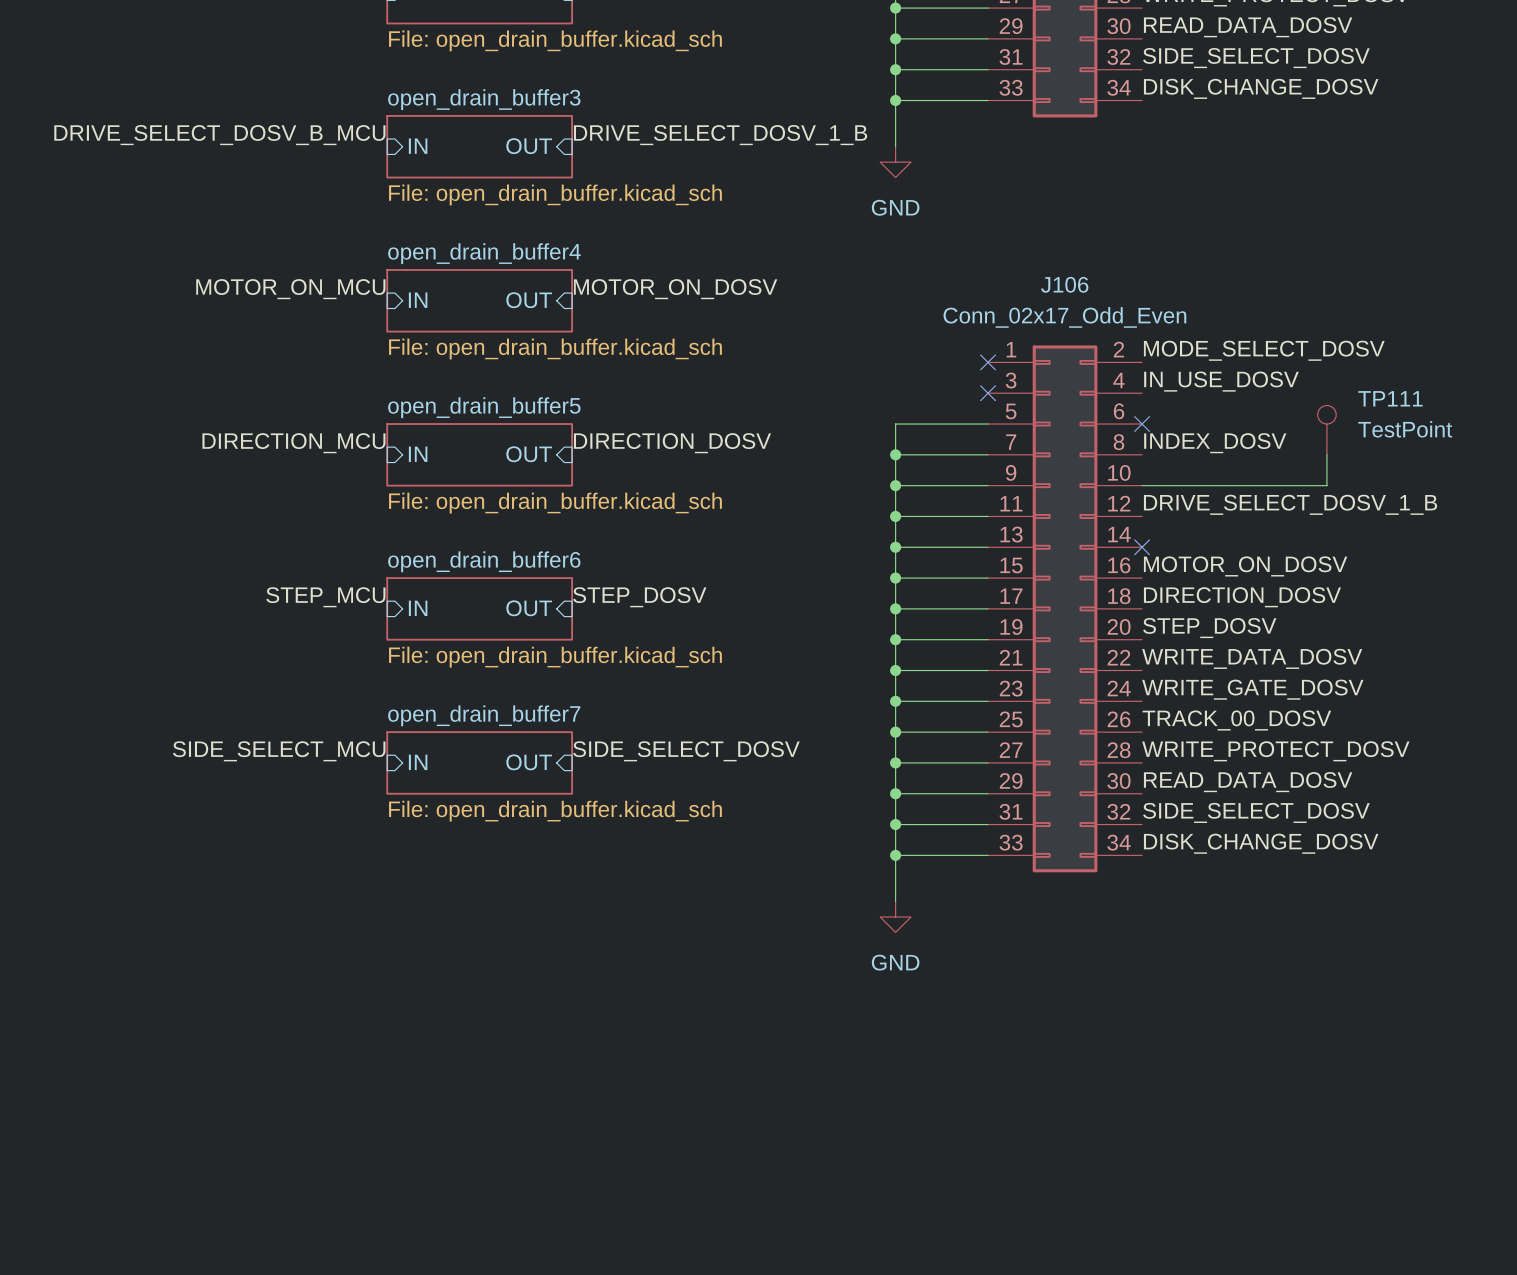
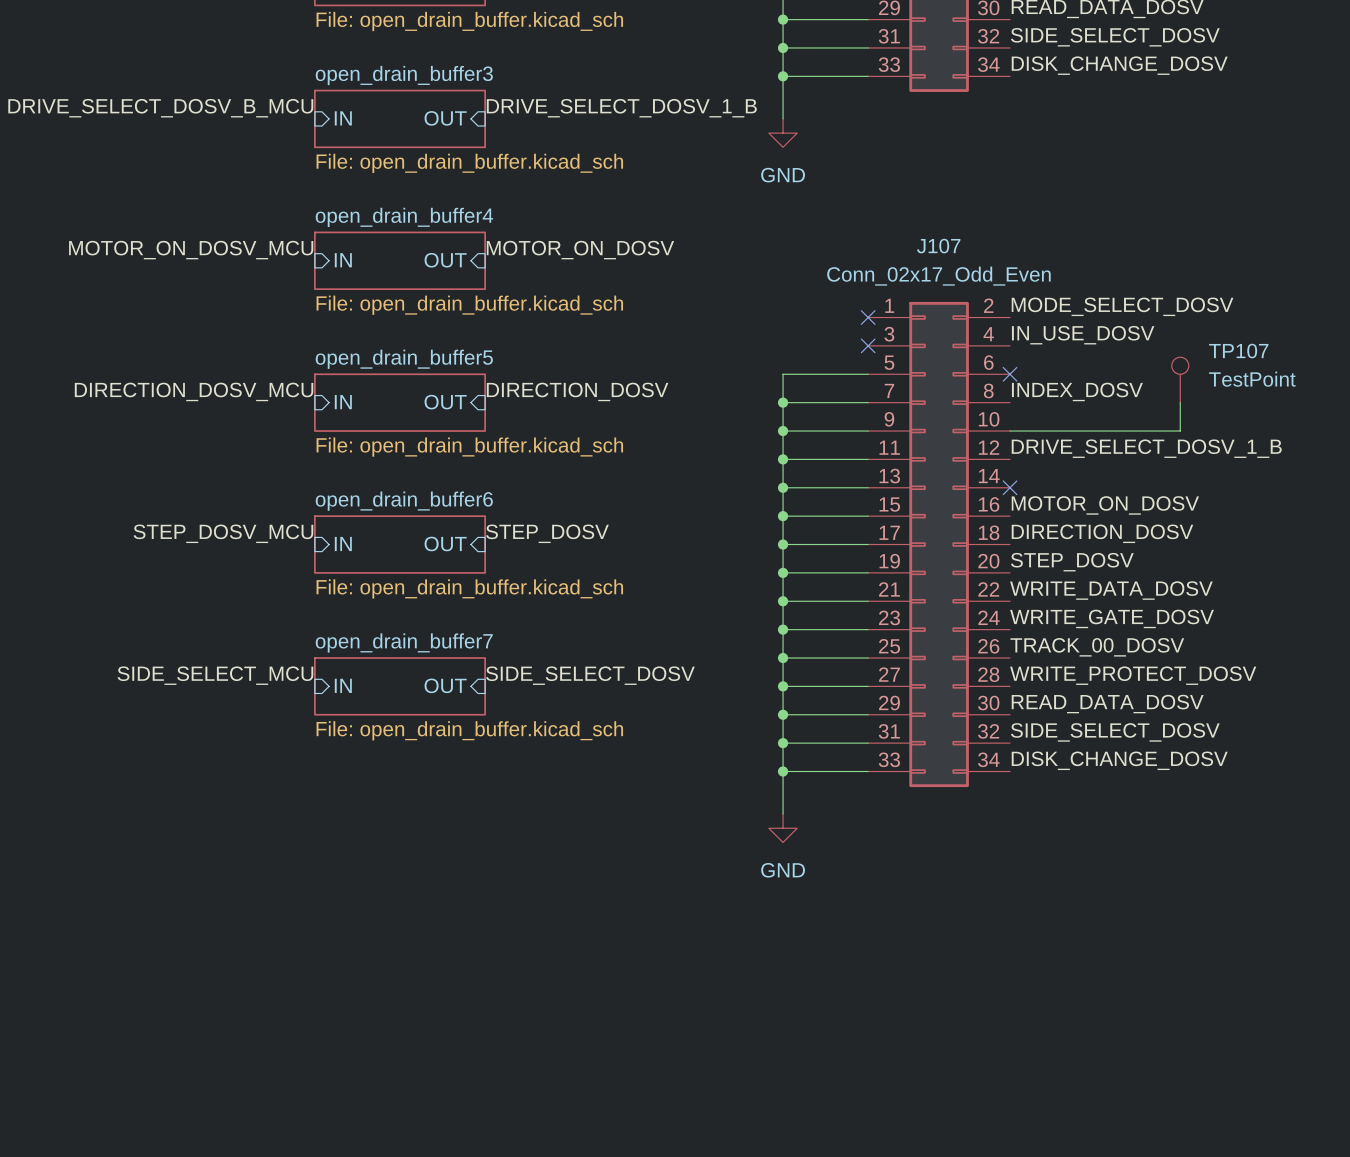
J106 name: J106 (1064, 284) -> J107 (938, 246)
label: MOTOR_ON_MCU (290, 289) -> MOTOR_ON_DOSV_MCU (191, 250)
TP111 name: TP111 (1390, 398) -> TP107 (1238, 351)
label: DIRECTION_MCU (293, 443) -> DIRECTION_DOSV_MCU (194, 391)
label: STEP_MCU (325, 597) -> STEP_DOSV_MCU (223, 533)

